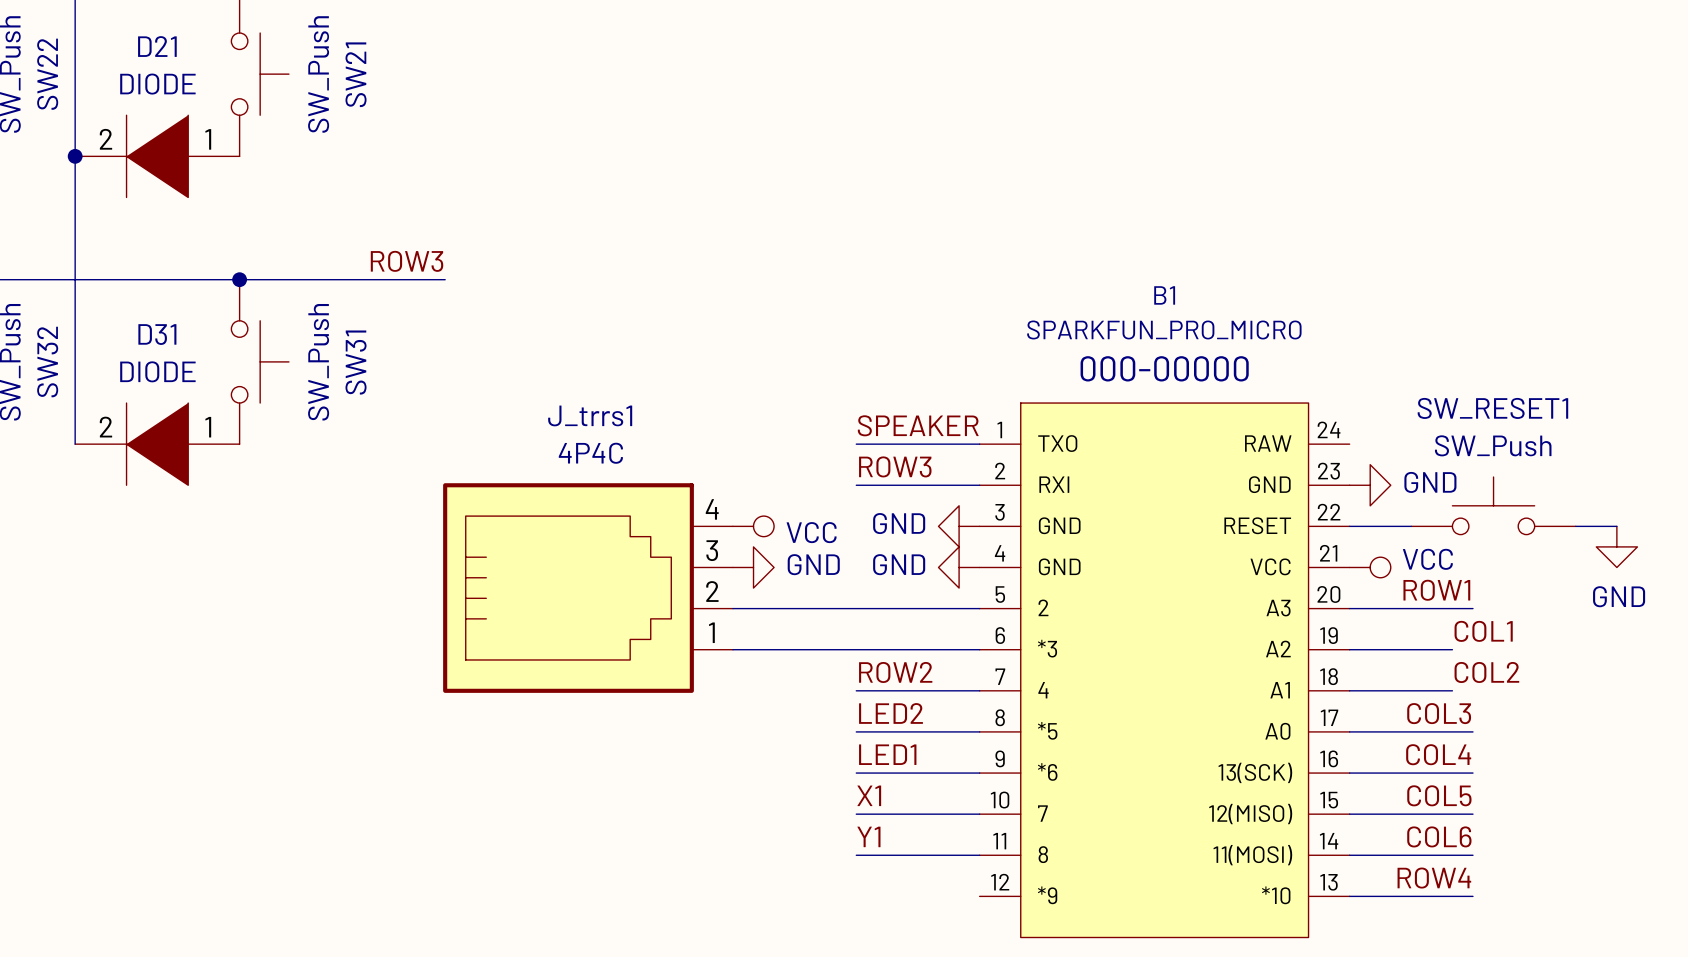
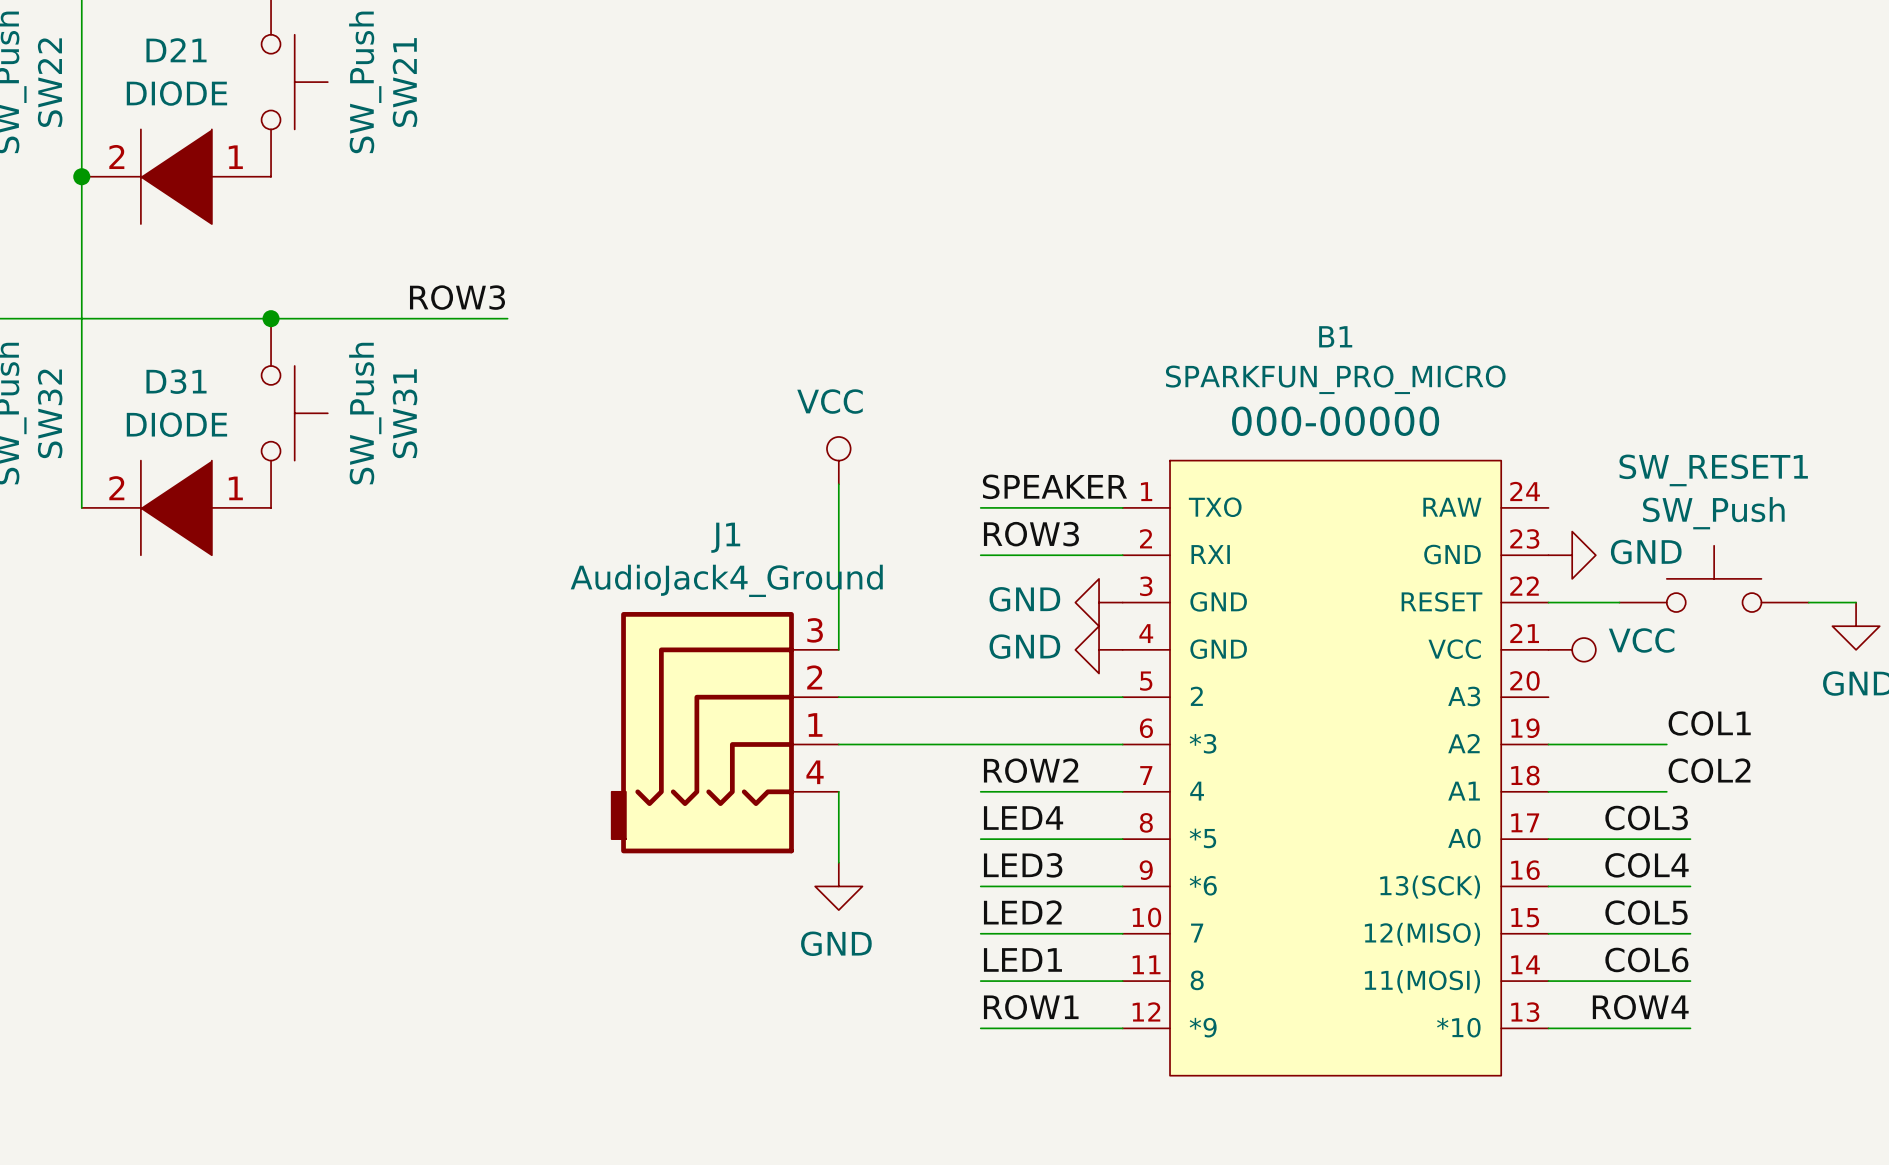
wire: none -> (838, 484) (838, 649)
power symbol rotation: 0° (753, 526) -> 90° counterclockwise (838, 460)
power symbol position: VCC (753, 526) -> VCC (838, 460)
power symbol rotation: 0° (753, 567) -> 90° clockwise (838, 886)
power symbol position: GND (753, 567) -> GND (838, 886)
J_trrs1: 4P4C (588, 588) -> none
label: ROW1 (1436, 590) -> none
wire: (1349, 608) (1472, 608) -> none
J1: none -> AudioJack4_Ground (725, 732)
wire: none -> (838, 791) (838, 862)
label: LED2 (890, 713) -> LED4 (1023, 818)
label: LED1 (887, 754) -> LED3 (1023, 865)
label: X1 (869, 795) -> LED2 (1022, 912)
label: Y1 (868, 836) -> LED1 (1022, 959)
label: none -> ROW1 (1031, 1007)
wire: none -> (980, 1028) (1122, 1028)

